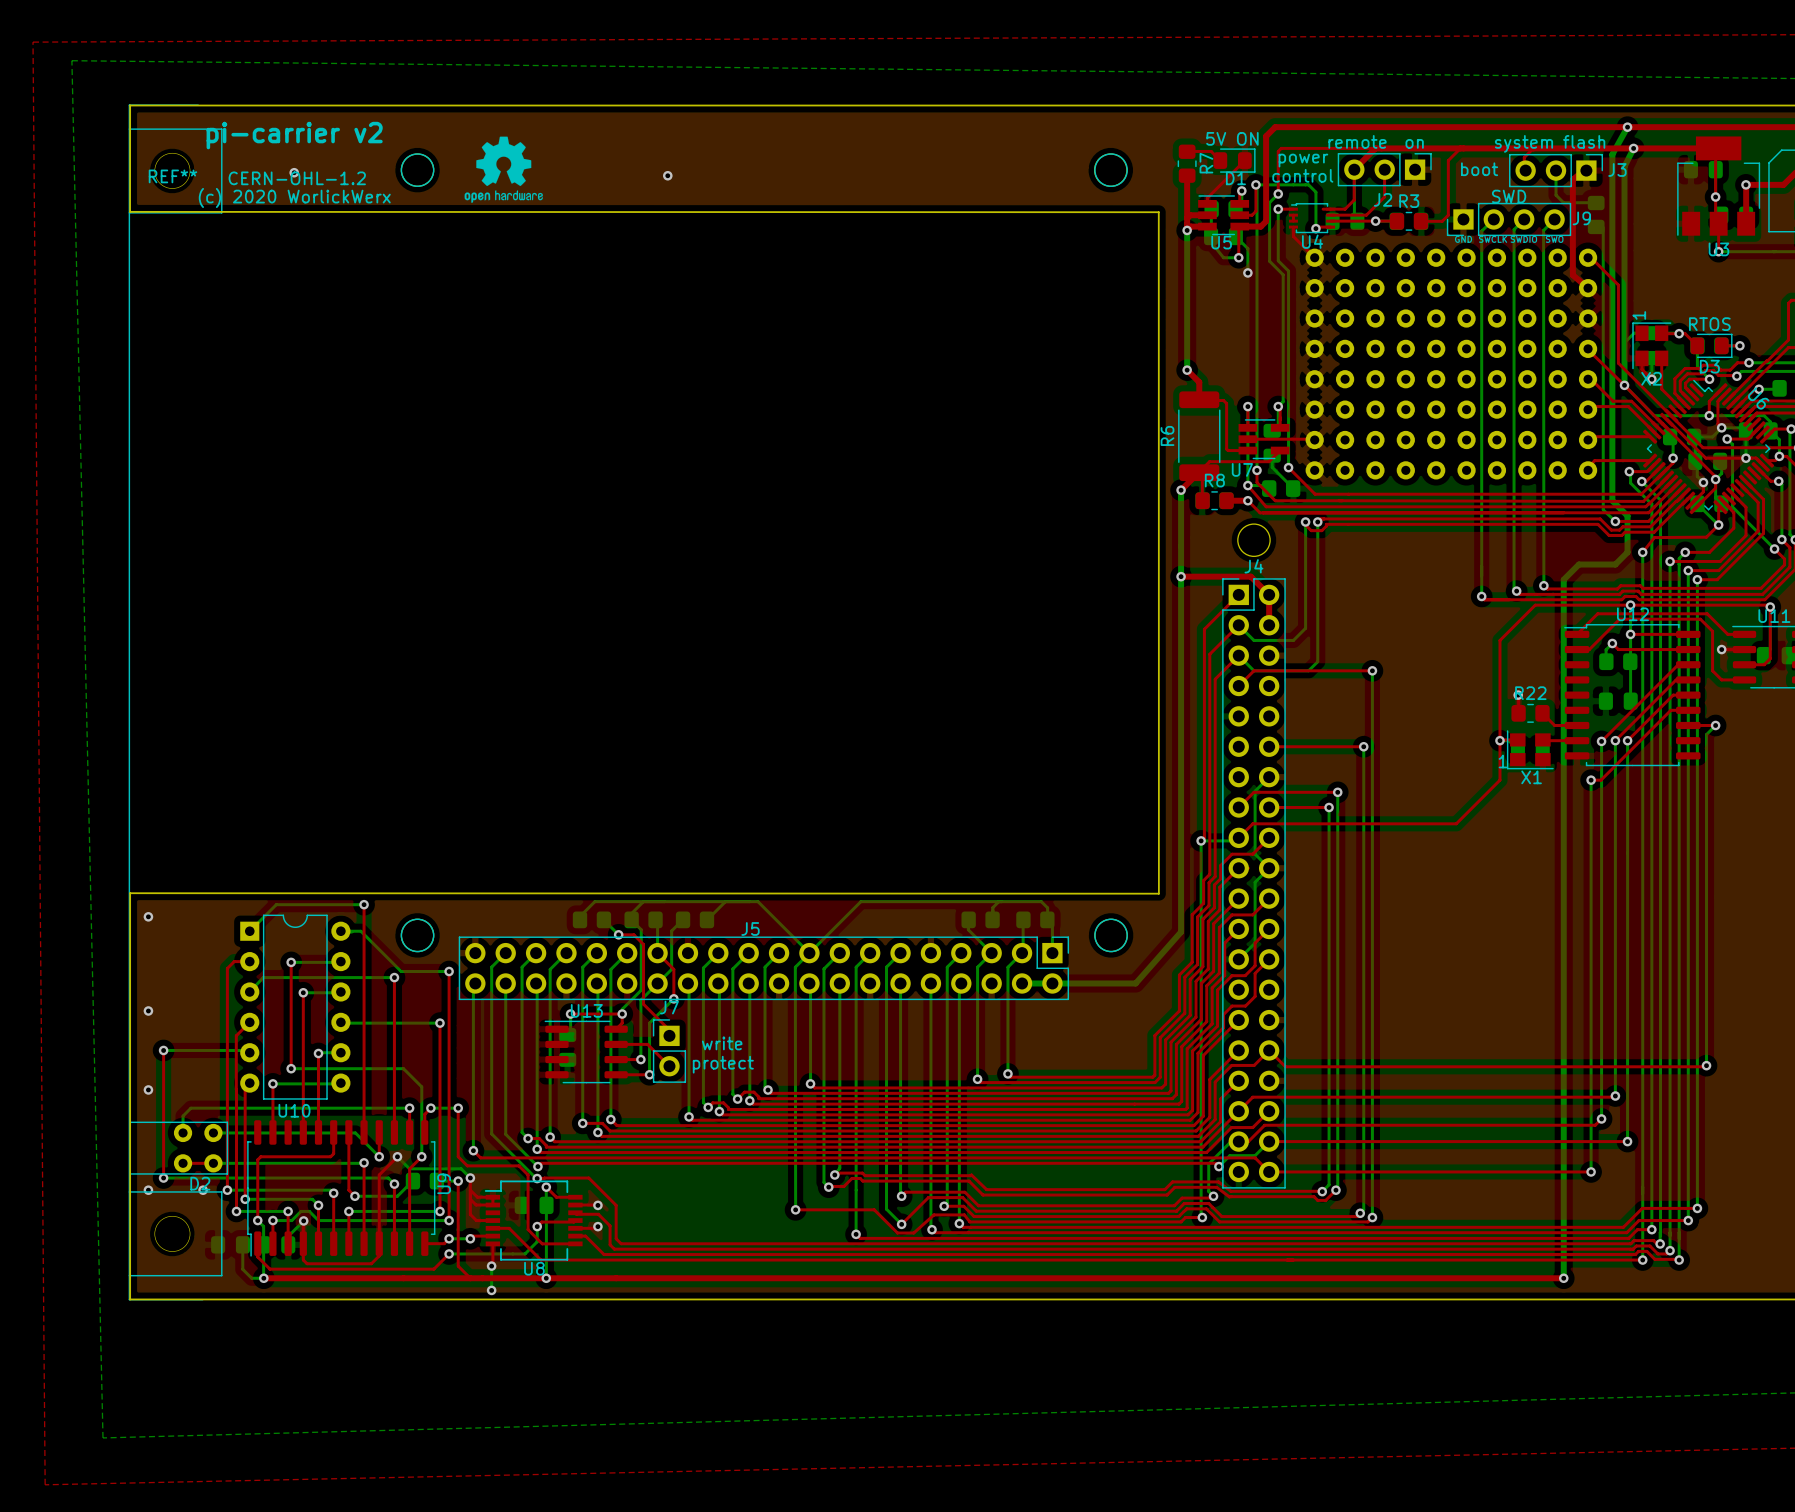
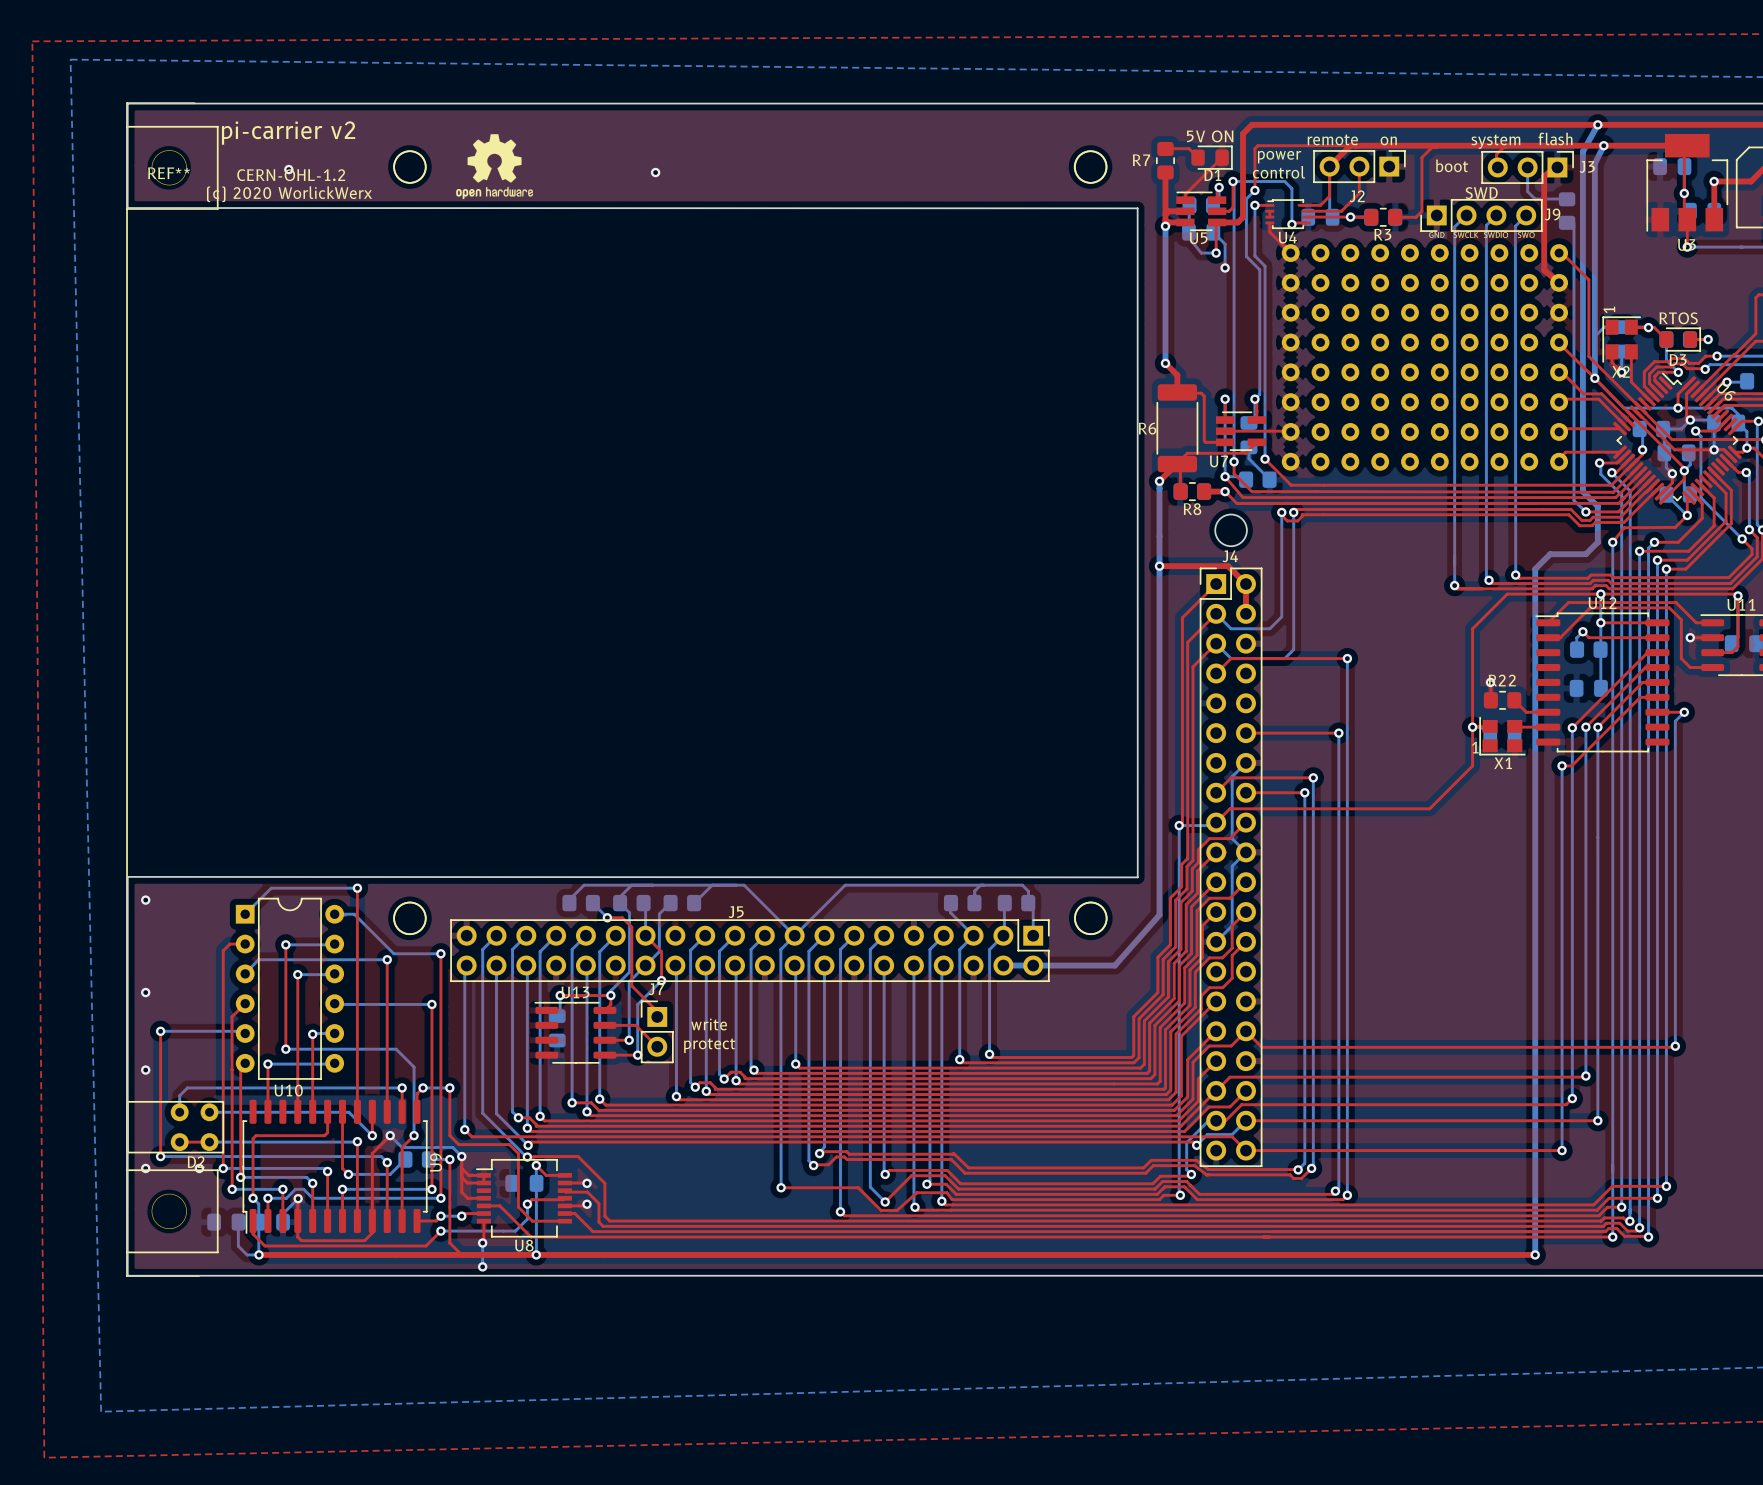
R7 name rotation: 0° (1206, 163) -> 90° clockwise (1141, 160)
R7 name position: R7 (1206, 163) -> R7 (1141, 160)
R3 name position: R3 (1409, 201) -> R3 (1382, 234)
R6 name rotation: 0° (1167, 435) -> 90° clockwise (1147, 428)
R8 name position: R8 (1214, 480) -> R8 (1192, 509)

